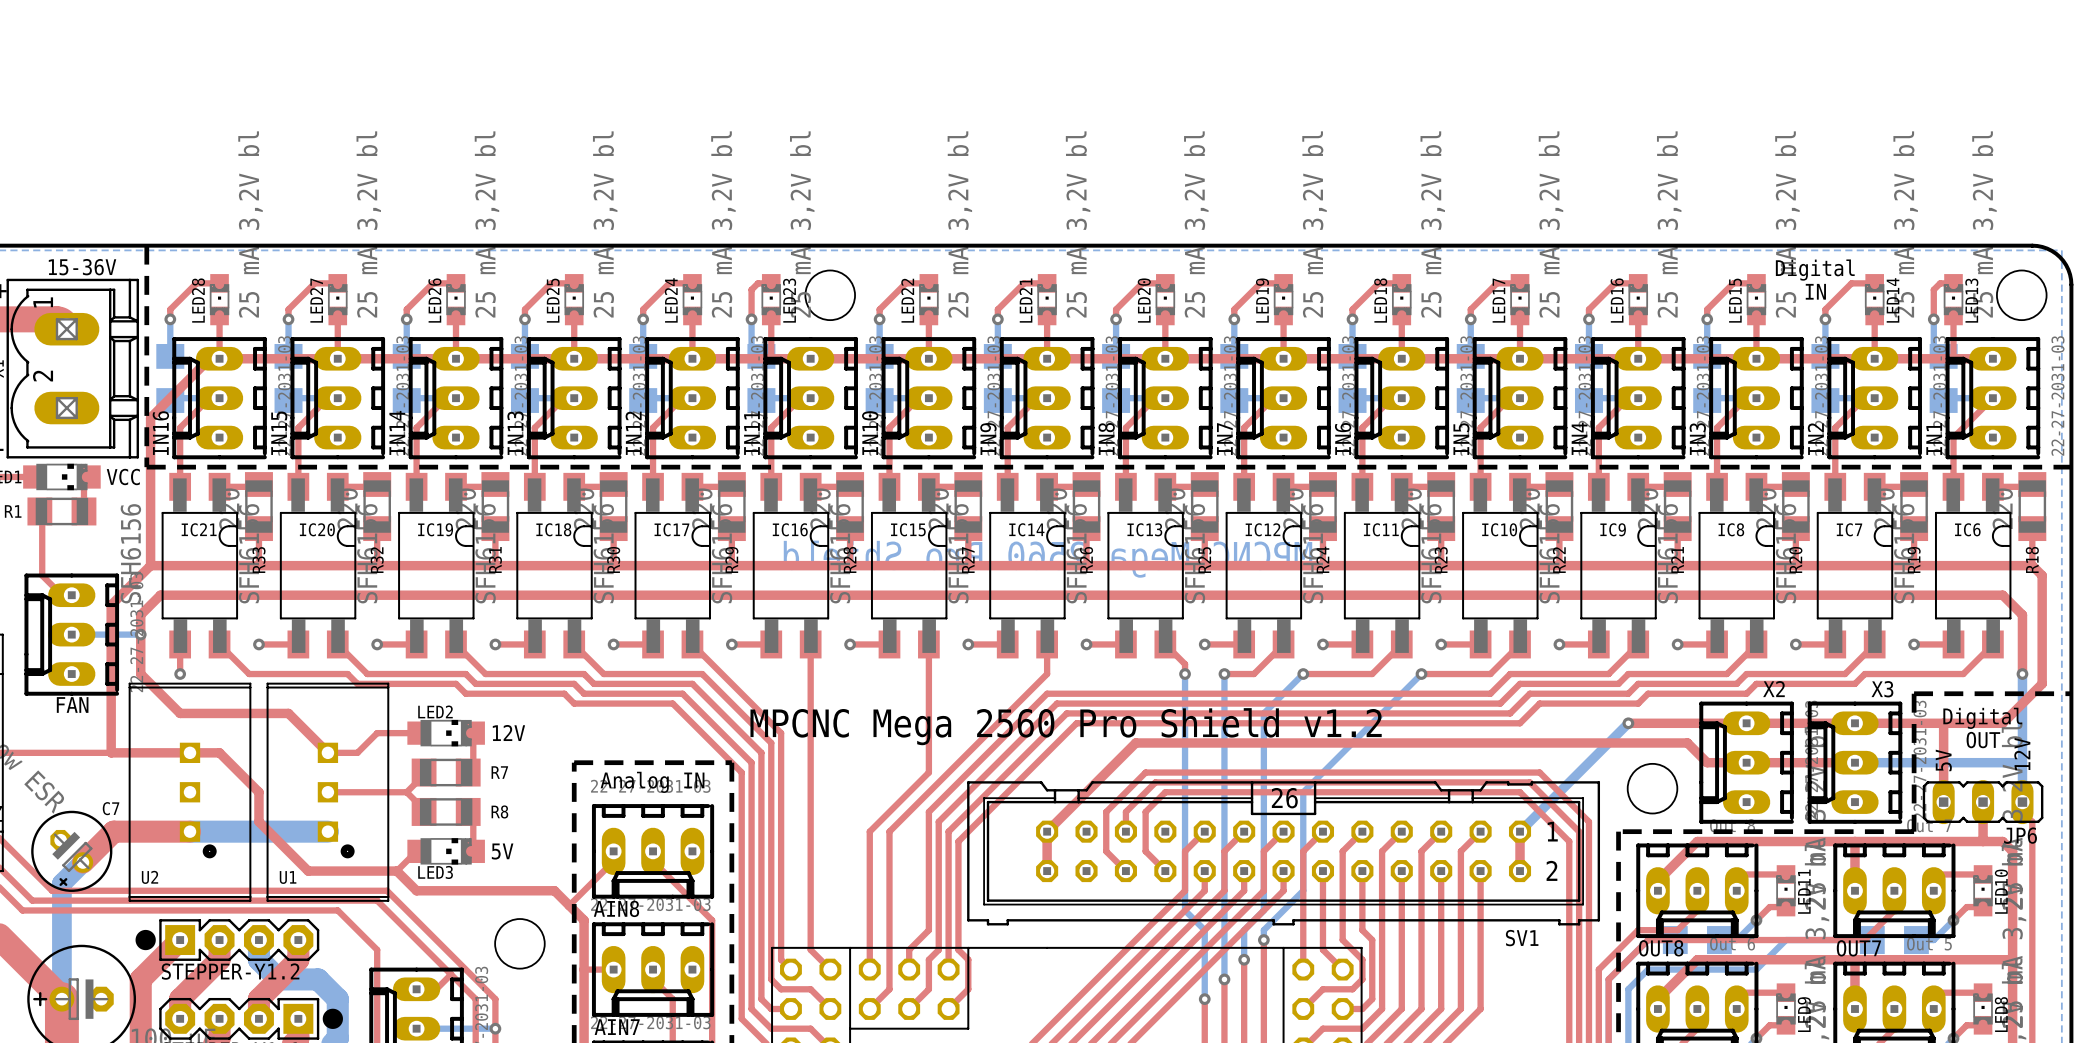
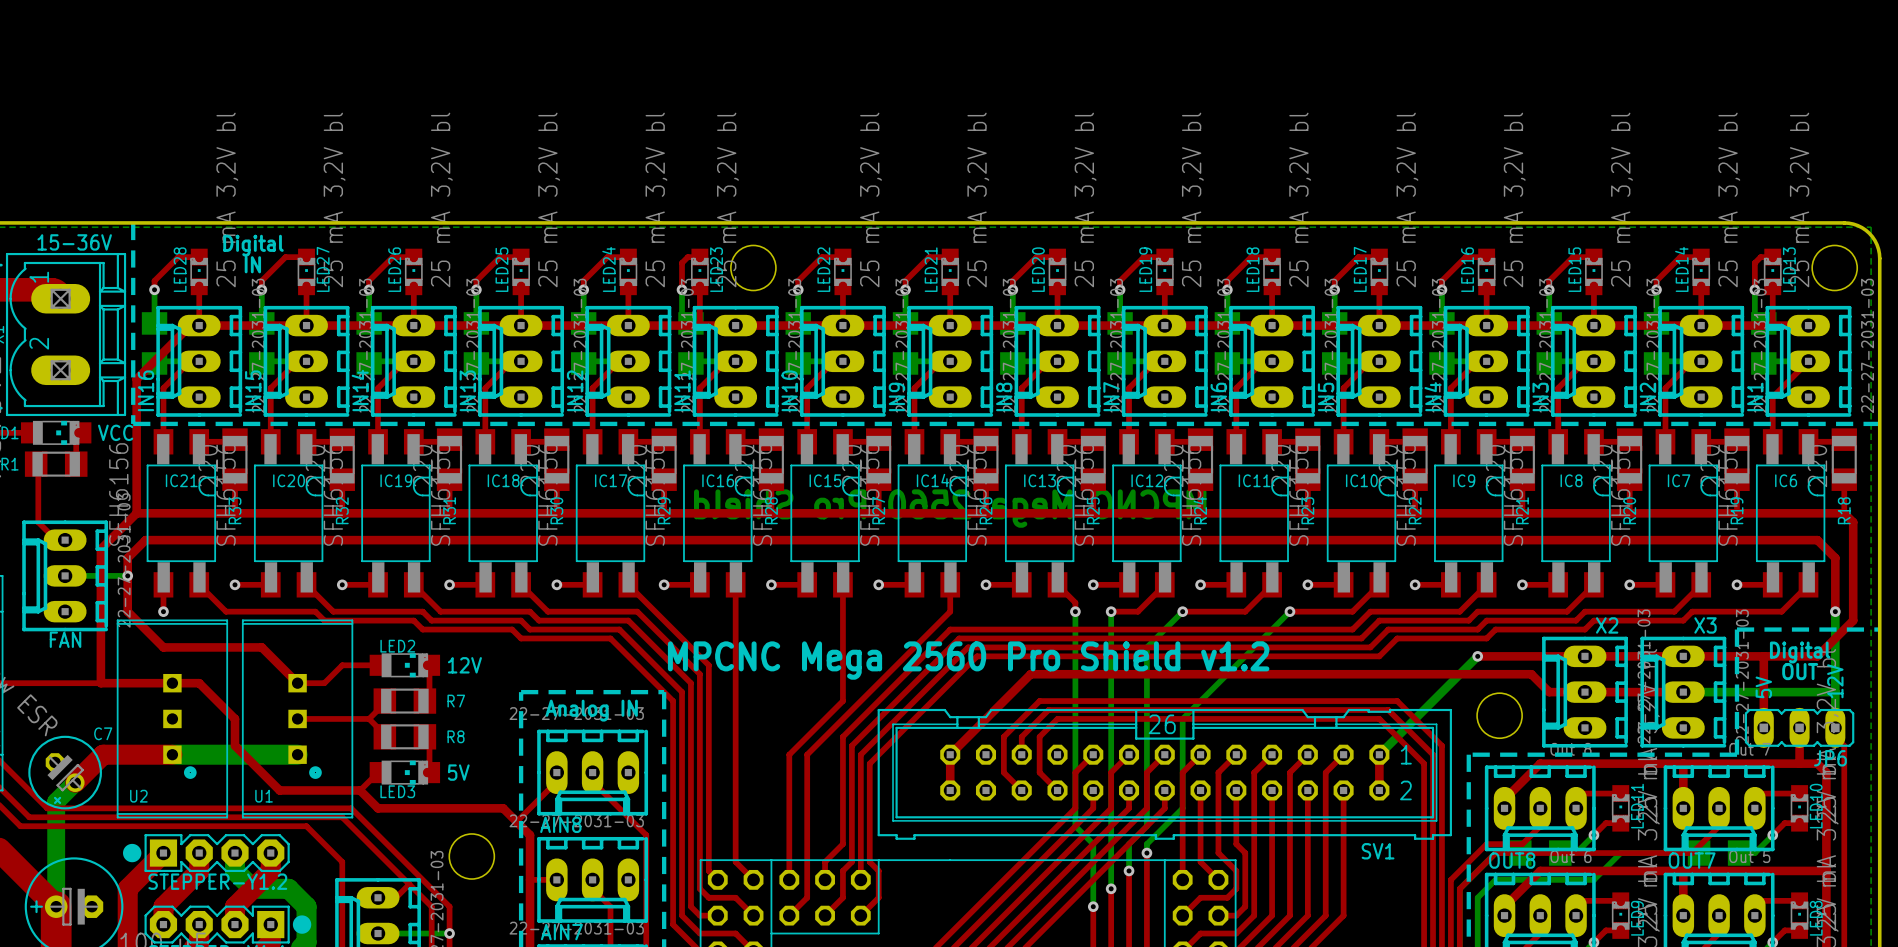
text: none -> Digital (253, 245)
text: Digital (1815, 270) -> none
text: none -> IN (252, 264)
text: IN (1815, 291) -> none
LED27 name position: LED27 (316, 300) -> LED27 (323, 269)
LED14 name position: LED14 (1893, 300) -> LED14 (1681, 269)

